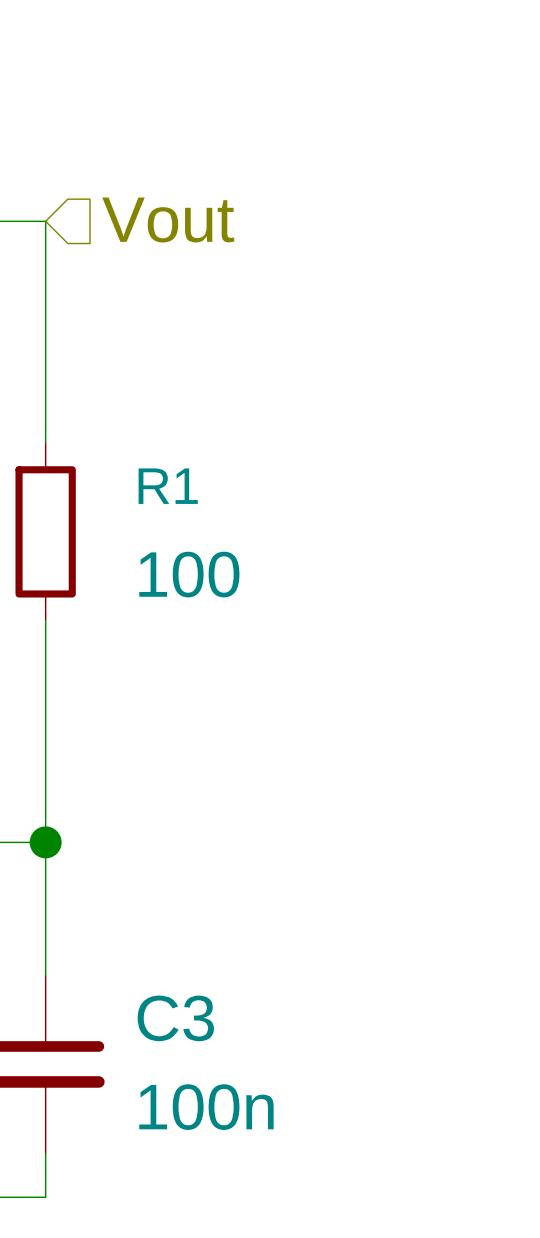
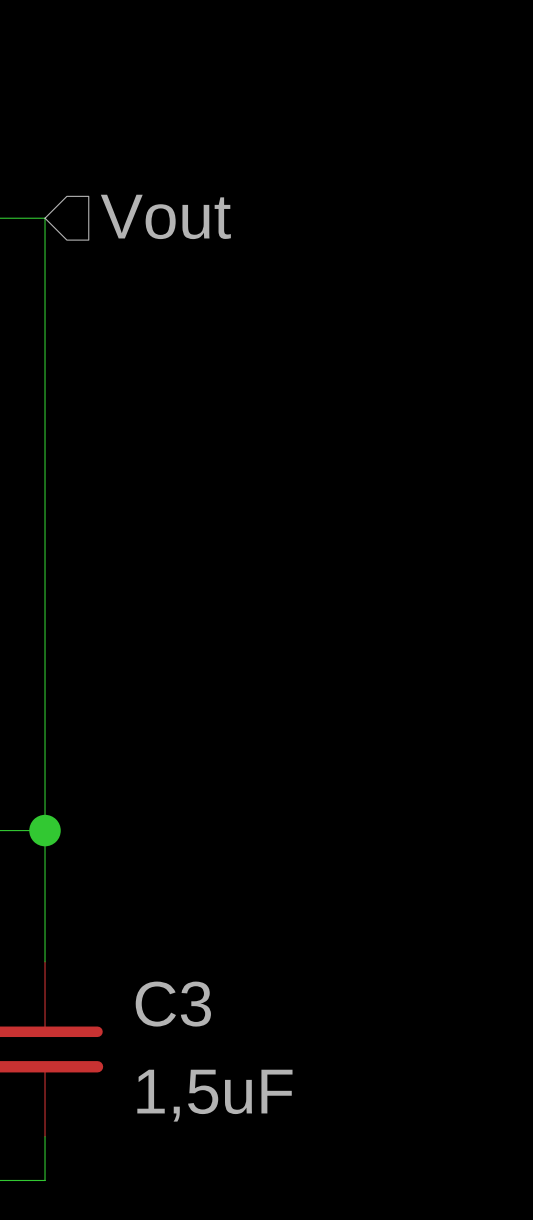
wire: none -> (45, 436) (45, 611)
R1: 100 (45, 531) -> none
C3 value: 100n (206, 1107) -> 1,5uF (214, 1095)

